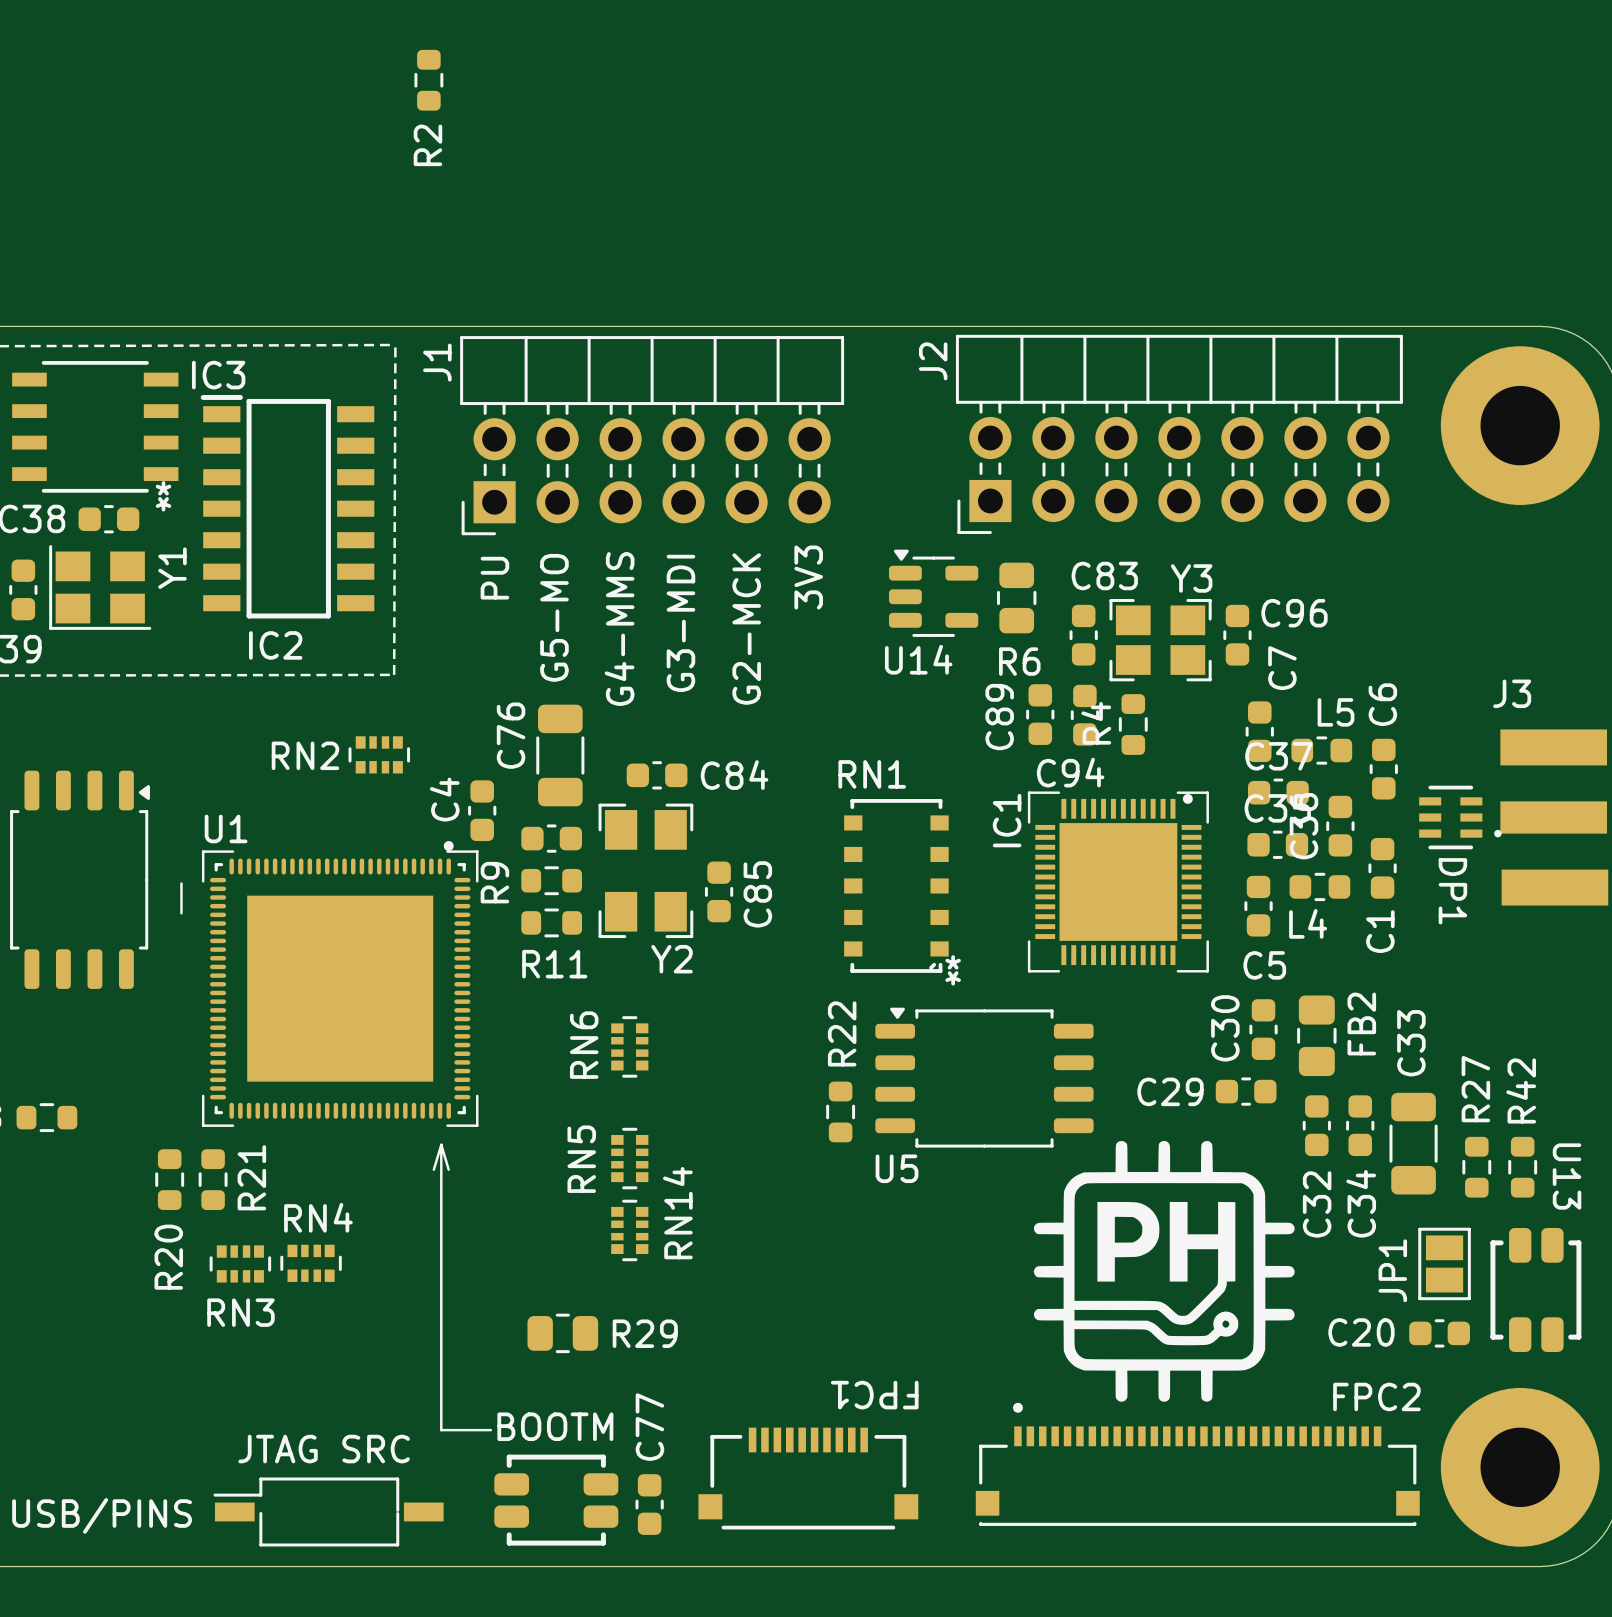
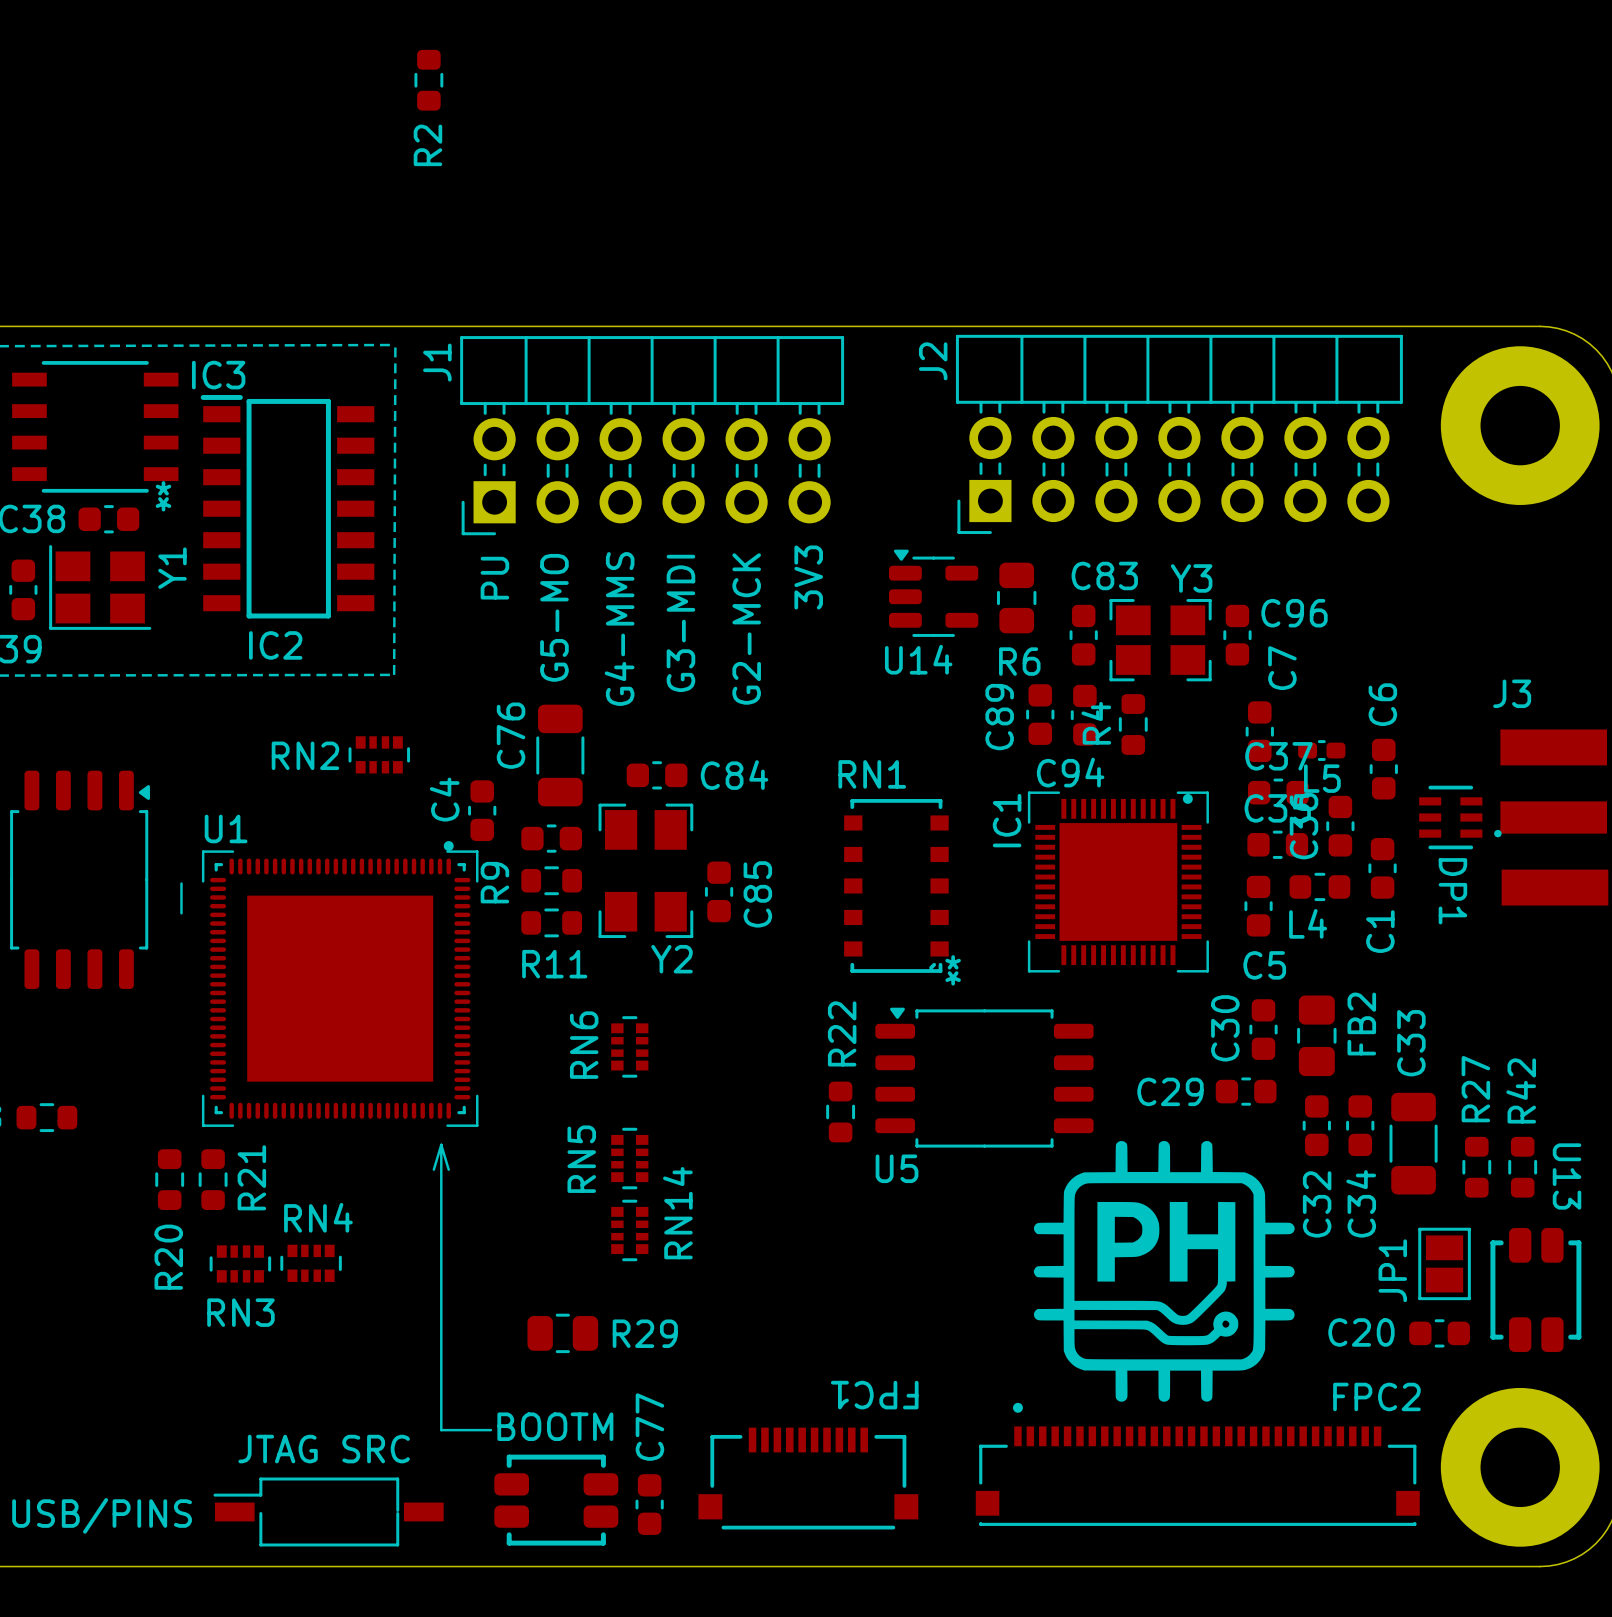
L5 name position: L5 (1336, 712) -> L5 (1322, 778)
L5 footprint: [1291, 736, 1353, 765] -> [1298, 740, 1346, 761]

